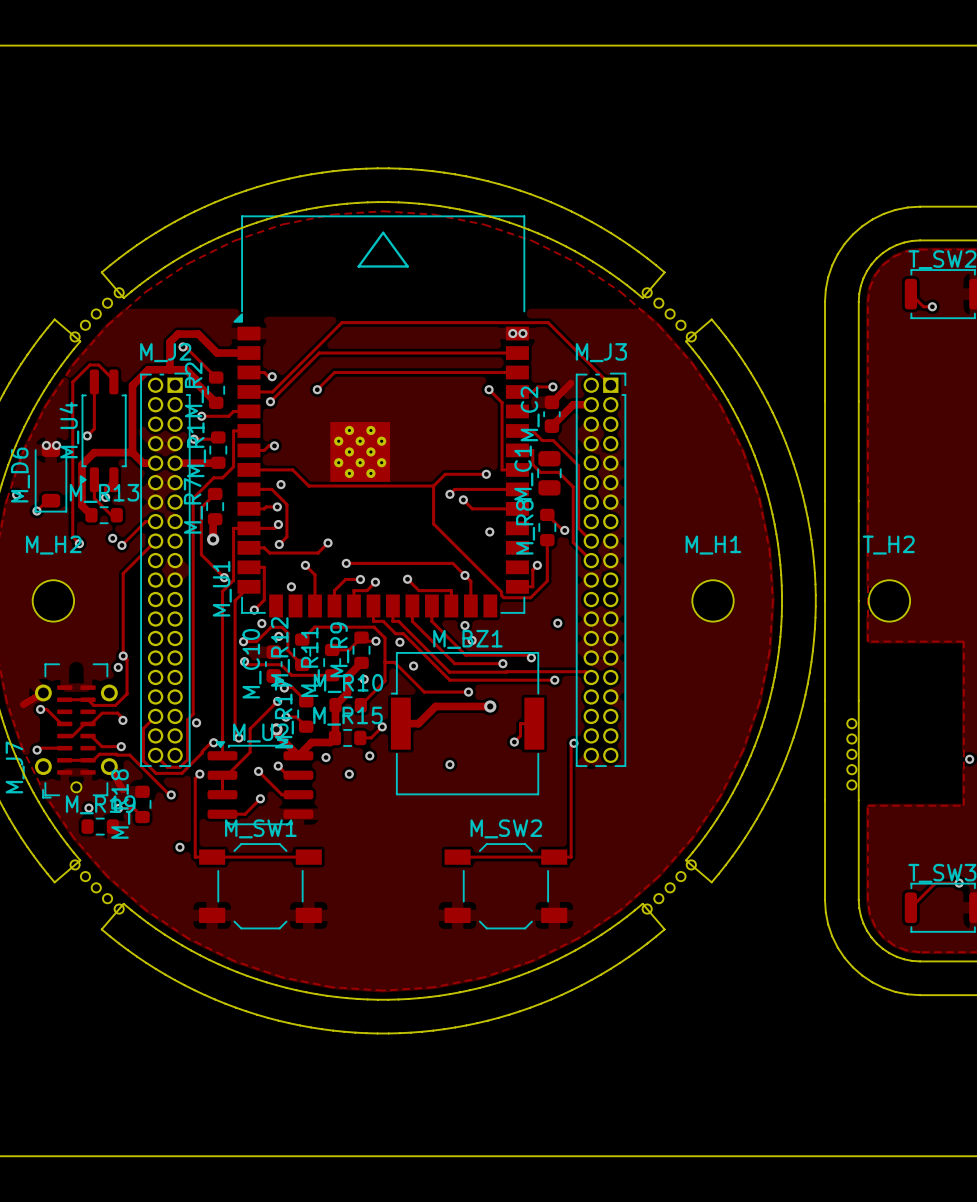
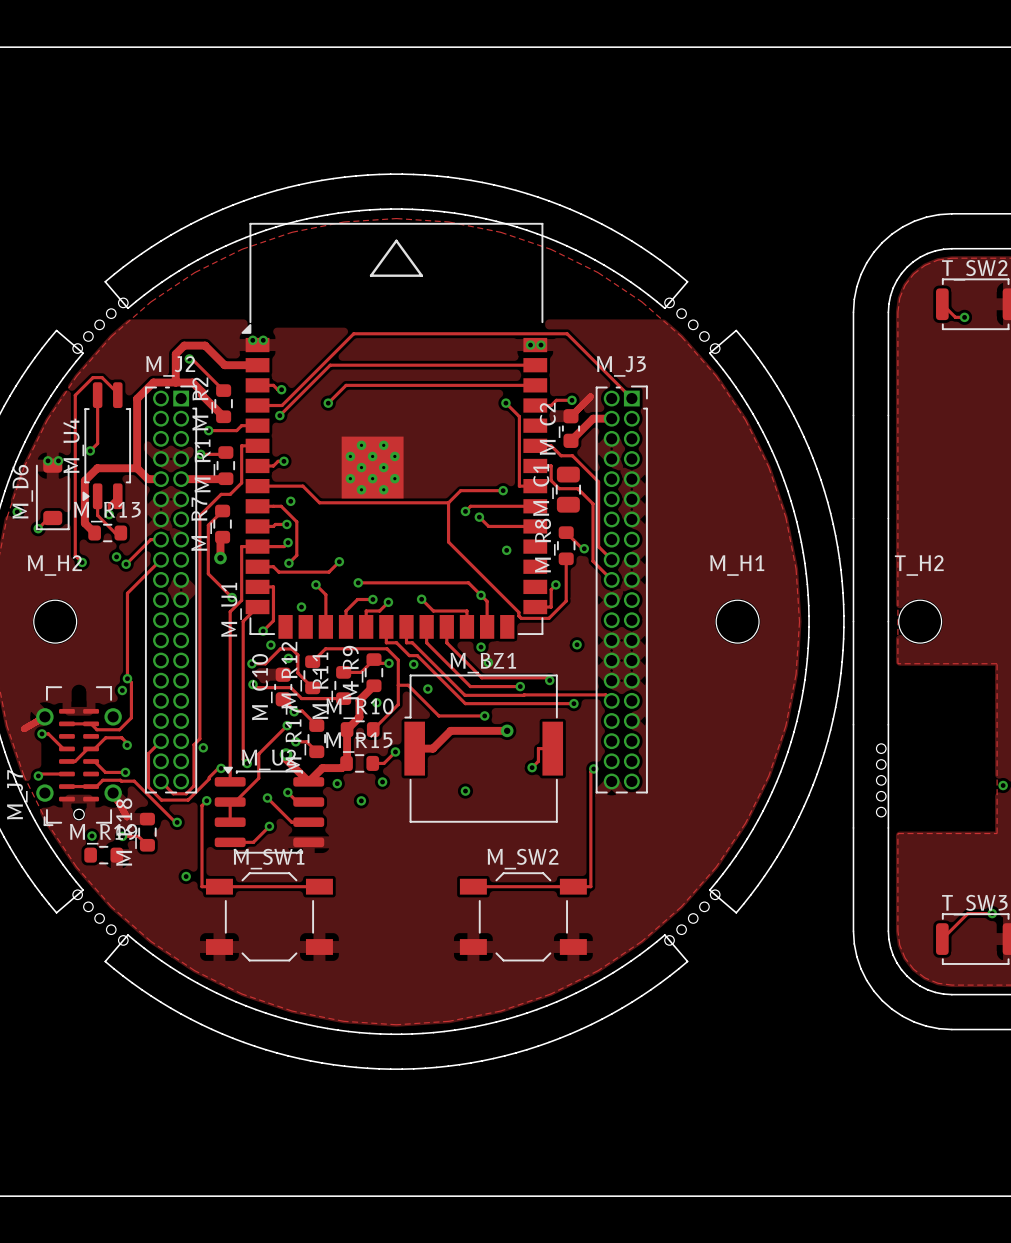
via: none -> (252, 340)
via: none -> (263, 340)

